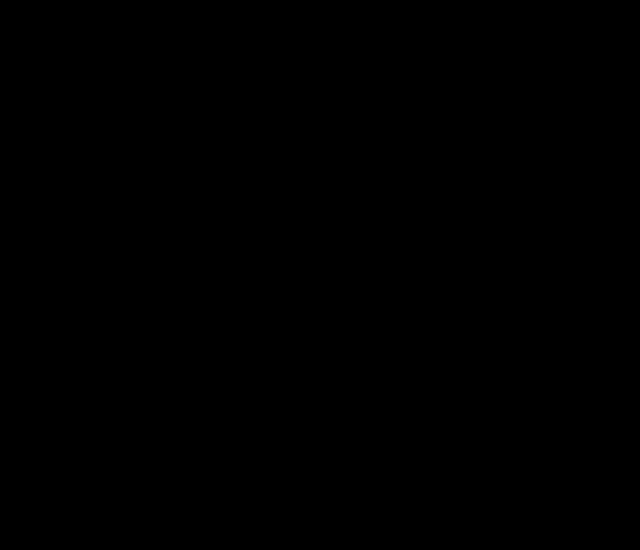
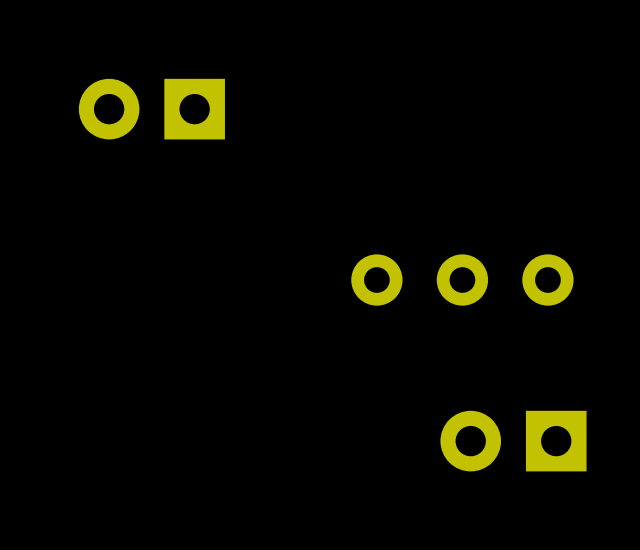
part: none -> (151, 109)
part: none -> (462, 280)
part: none -> (513, 441)

